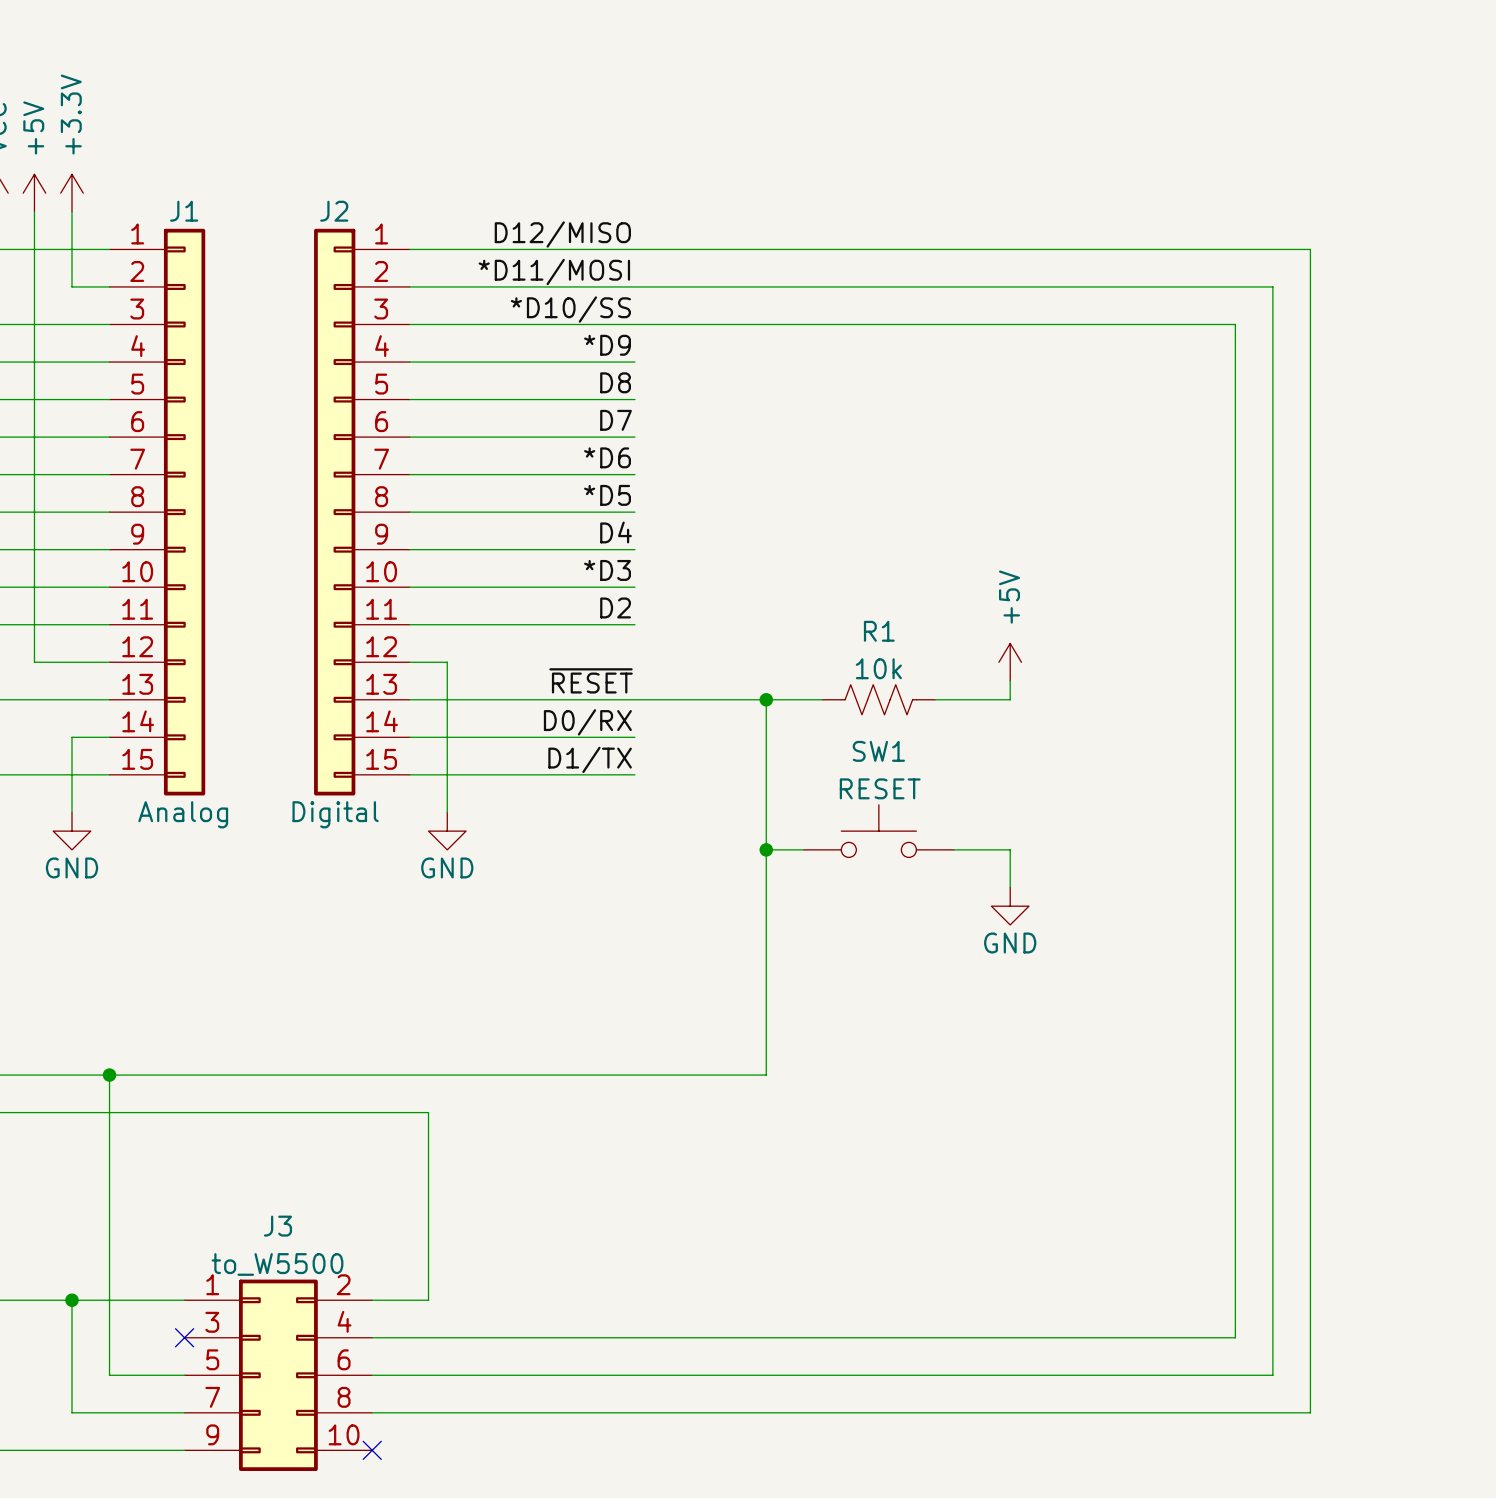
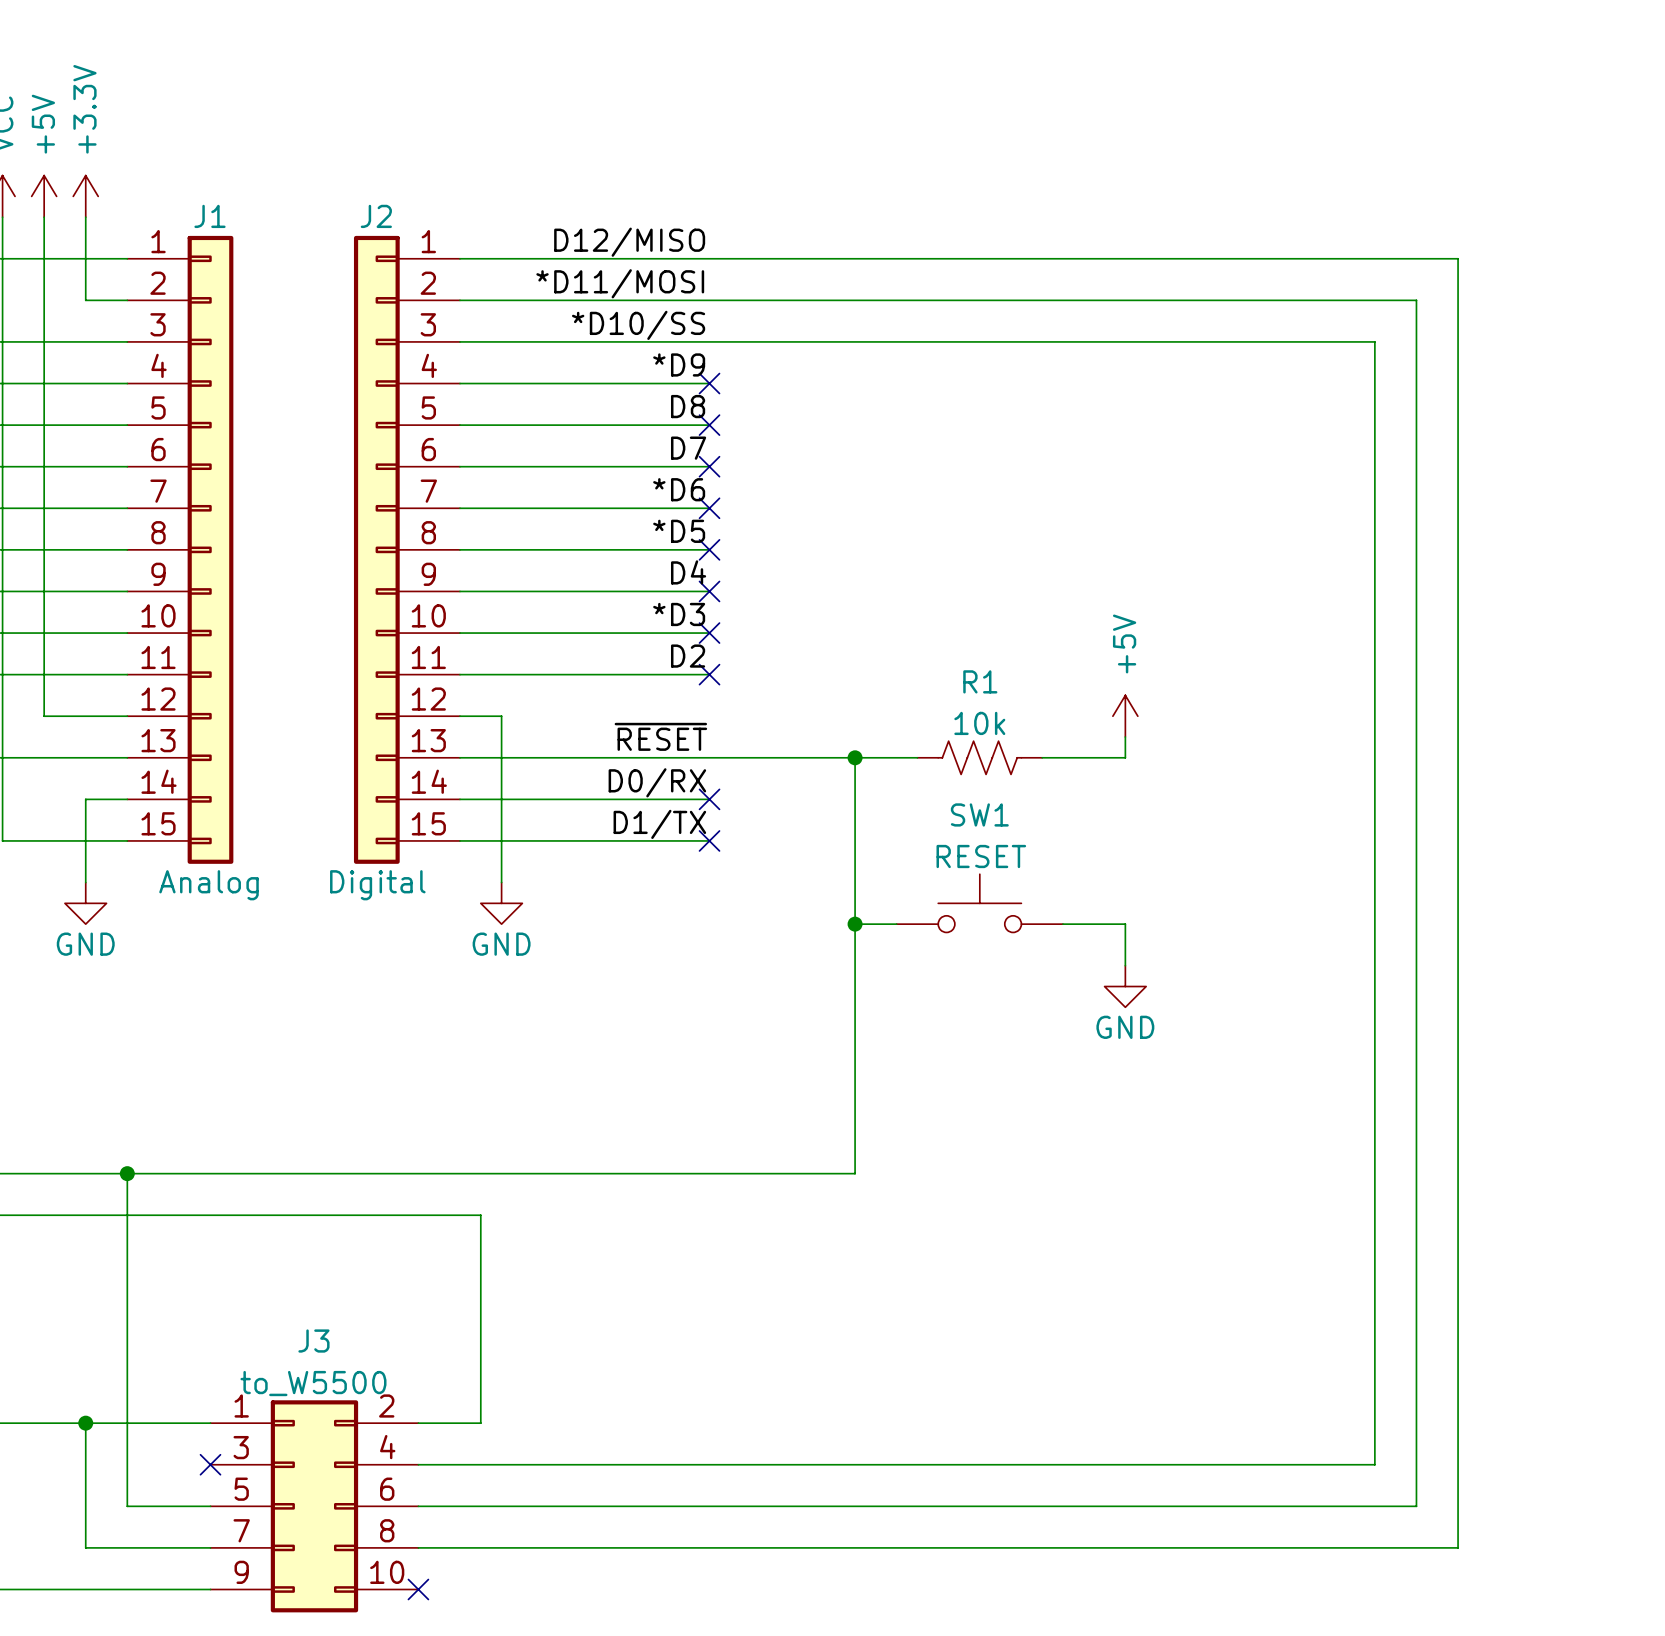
no-connect mark: none -> (709, 383)
no-connect mark: none -> (709, 425)
no-connect mark: none -> (709, 466)
no-connect mark: none -> (709, 508)
no-connect mark: none -> (709, 549)
no-connect mark: none -> (709, 591)
no-connect mark: none -> (709, 633)
no-connect mark: none -> (709, 674)
no-connect mark: none -> (709, 799)
no-connect mark: none -> (709, 840)

